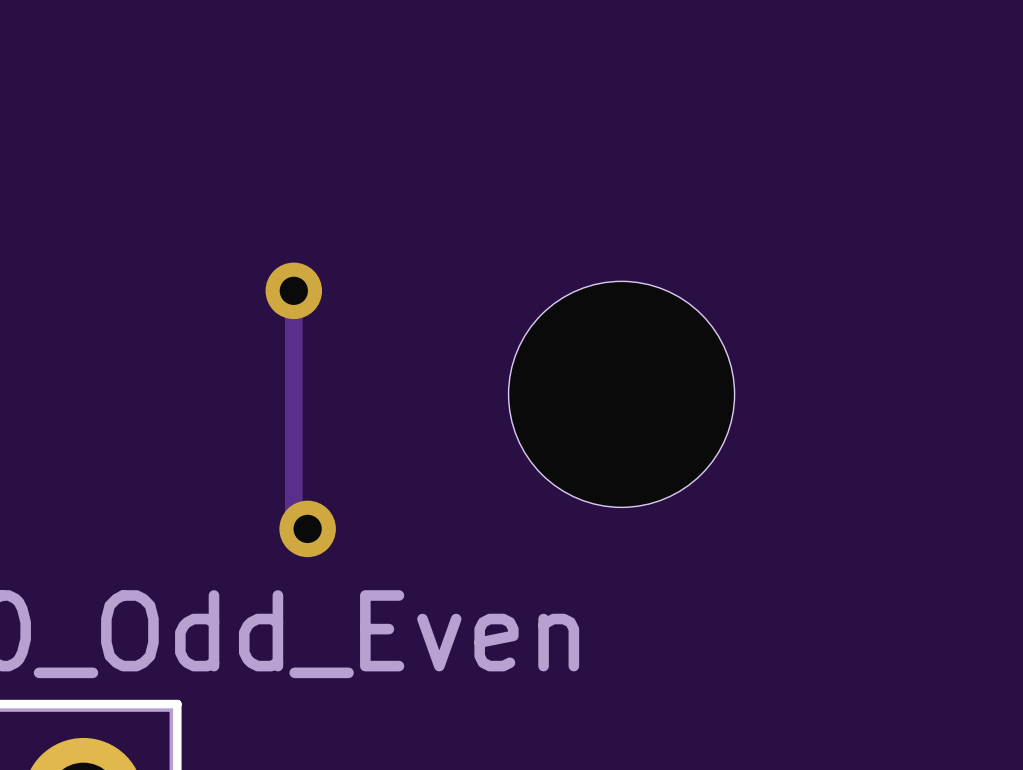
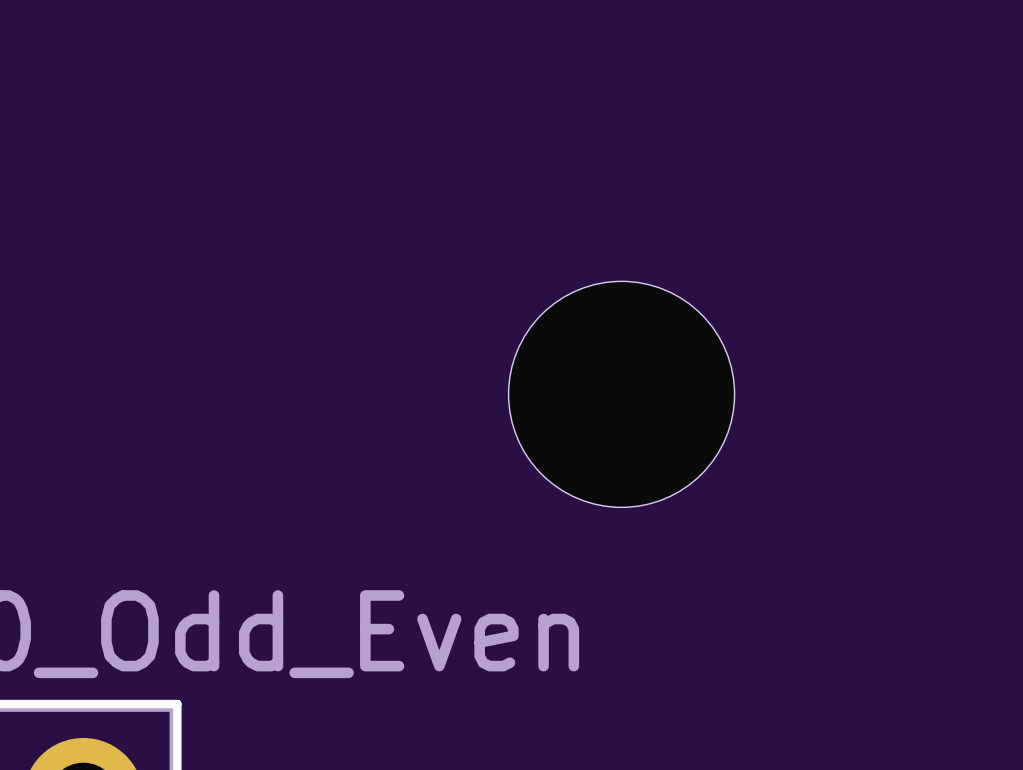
track: (293, 290) (293, 515) (307, 528) -> none
via: (293, 290) -> none
via: (307, 528) -> none

